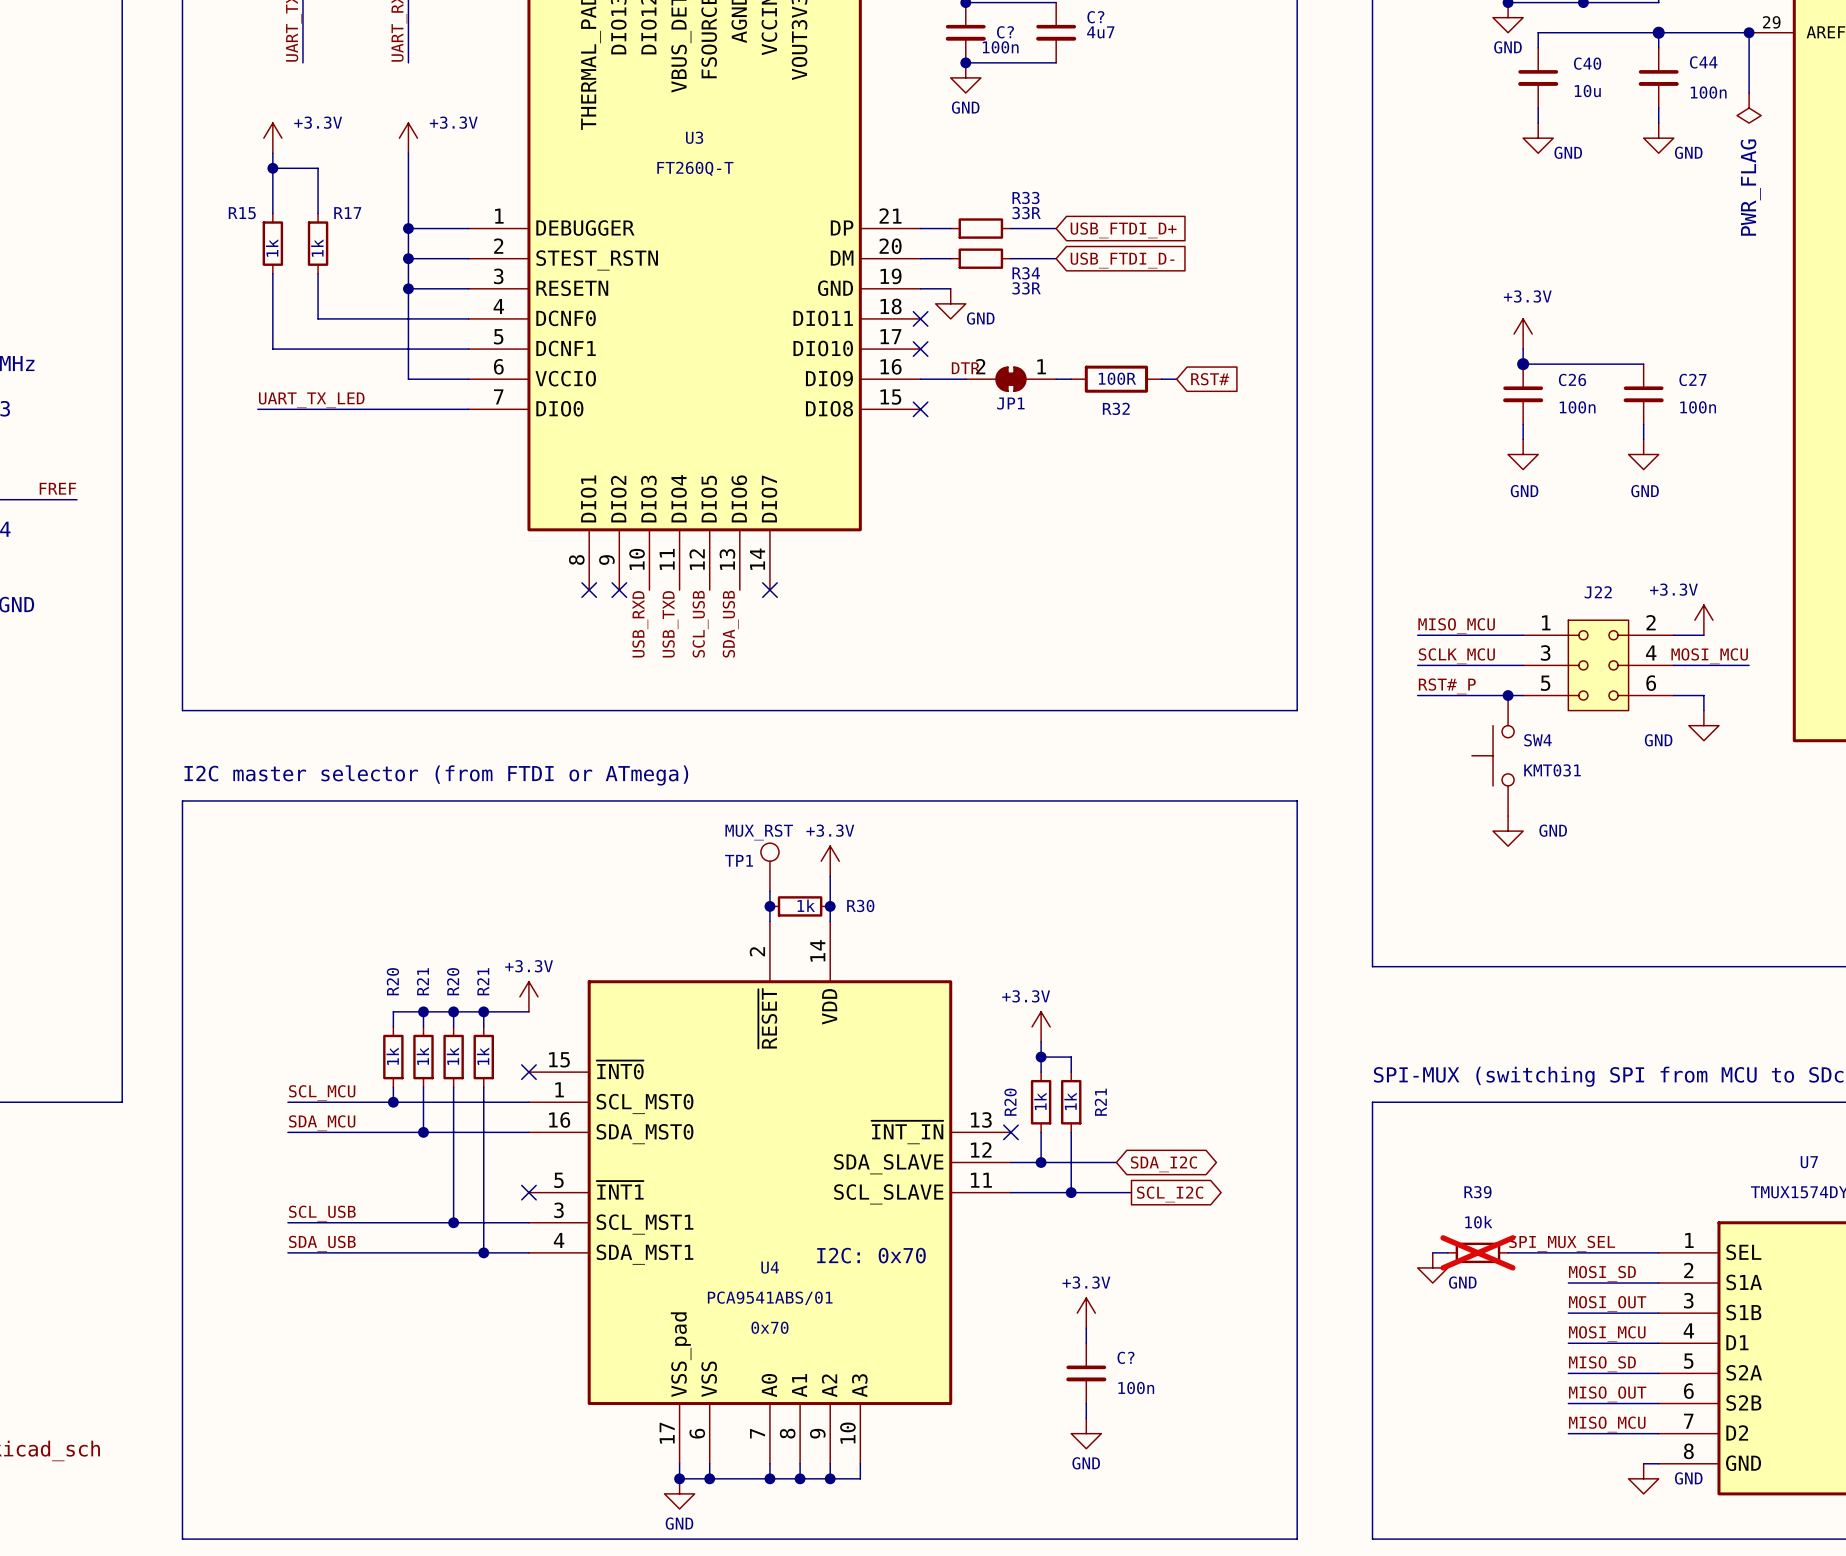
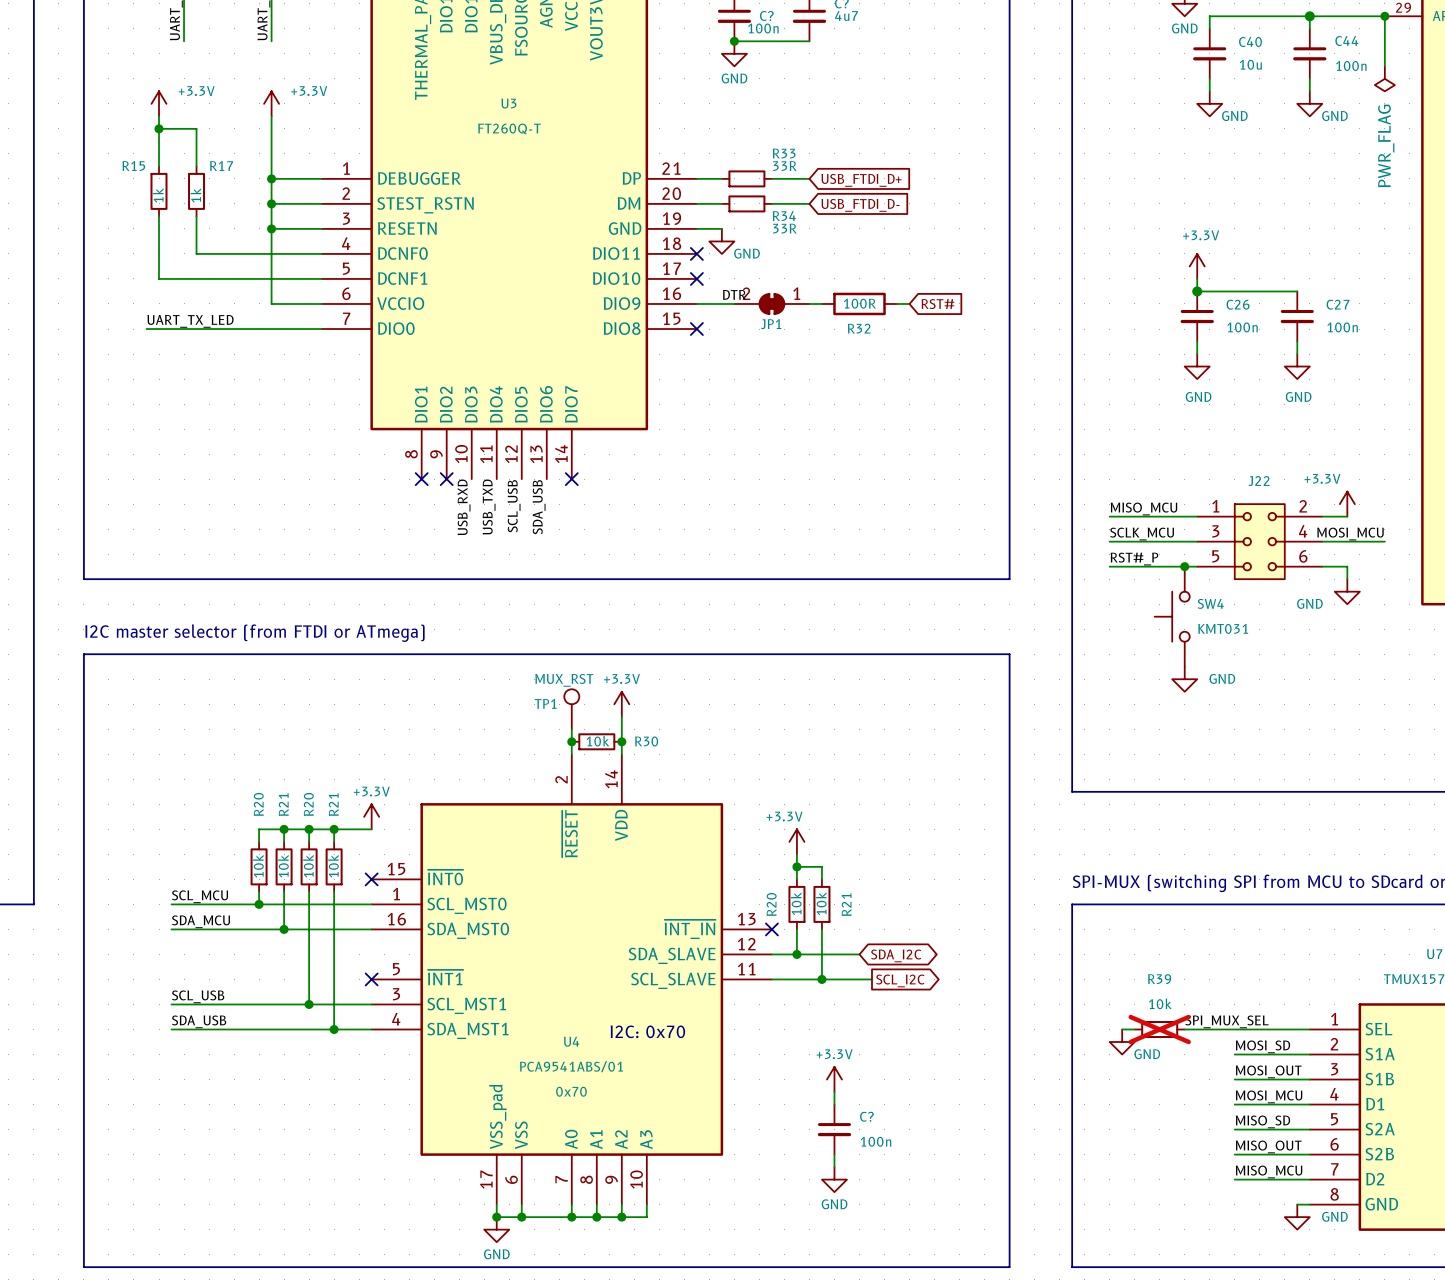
R30 value: 1k (806, 905) -> 10k (597, 741)
R20 value: 1k (392, 1056) -> 10k (258, 866)
R21 value: 1k (422, 1056) -> 10k (283, 866)
R20 value: 1k (452, 1056) -> 10k (308, 866)
R21 value: 1k (483, 1056) -> 10k (333, 866)
R20 value: 1k (1040, 1101) -> 10k (796, 903)
R21 value: 1k (1070, 1101) -> 10k (821, 903)

